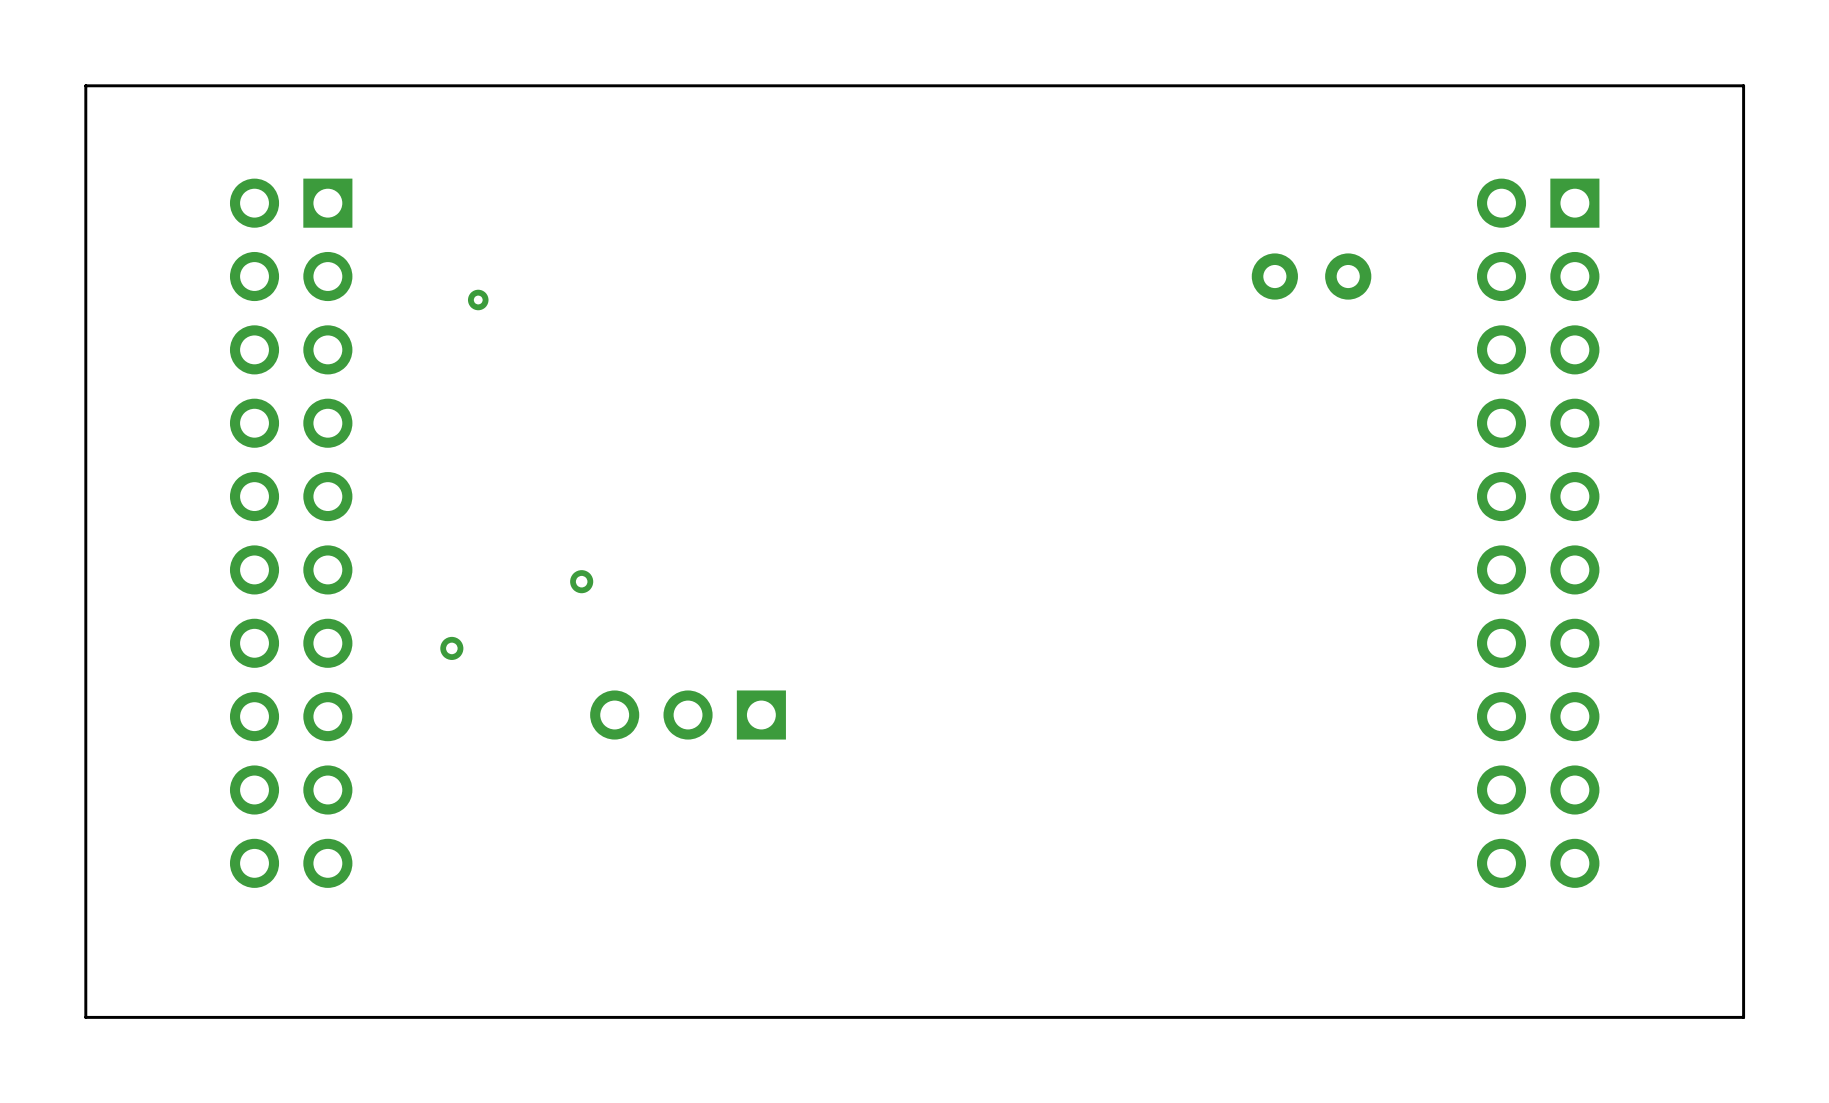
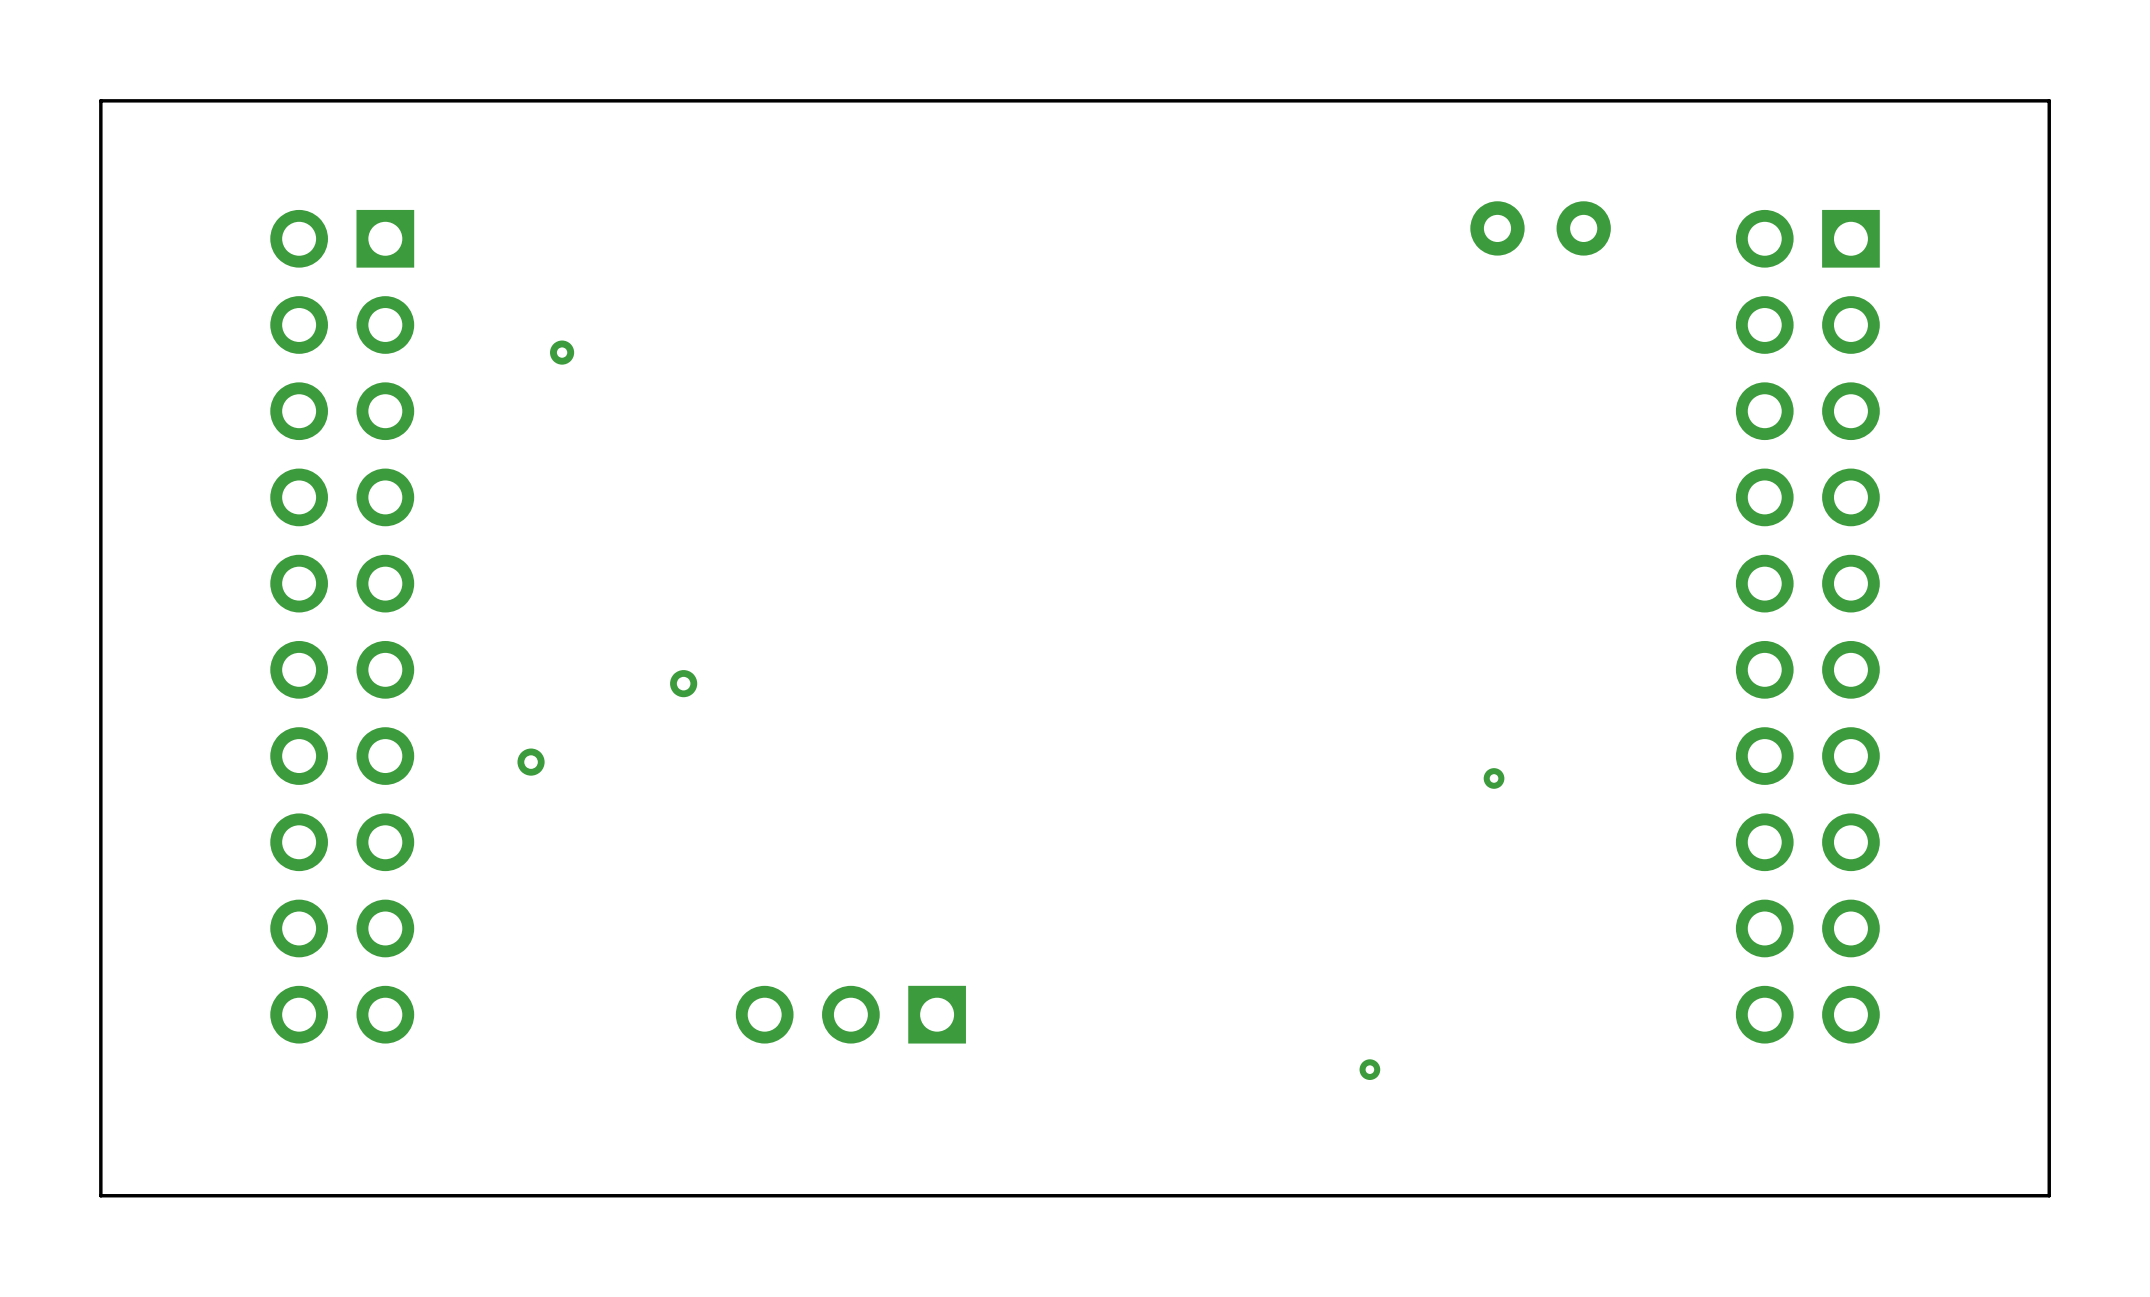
part position: (1311, 276) -> (1540, 228)
via: none -> (1494, 778)
part position: (688, 715) -> (850, 1014)
via: none -> (1369, 1069)

